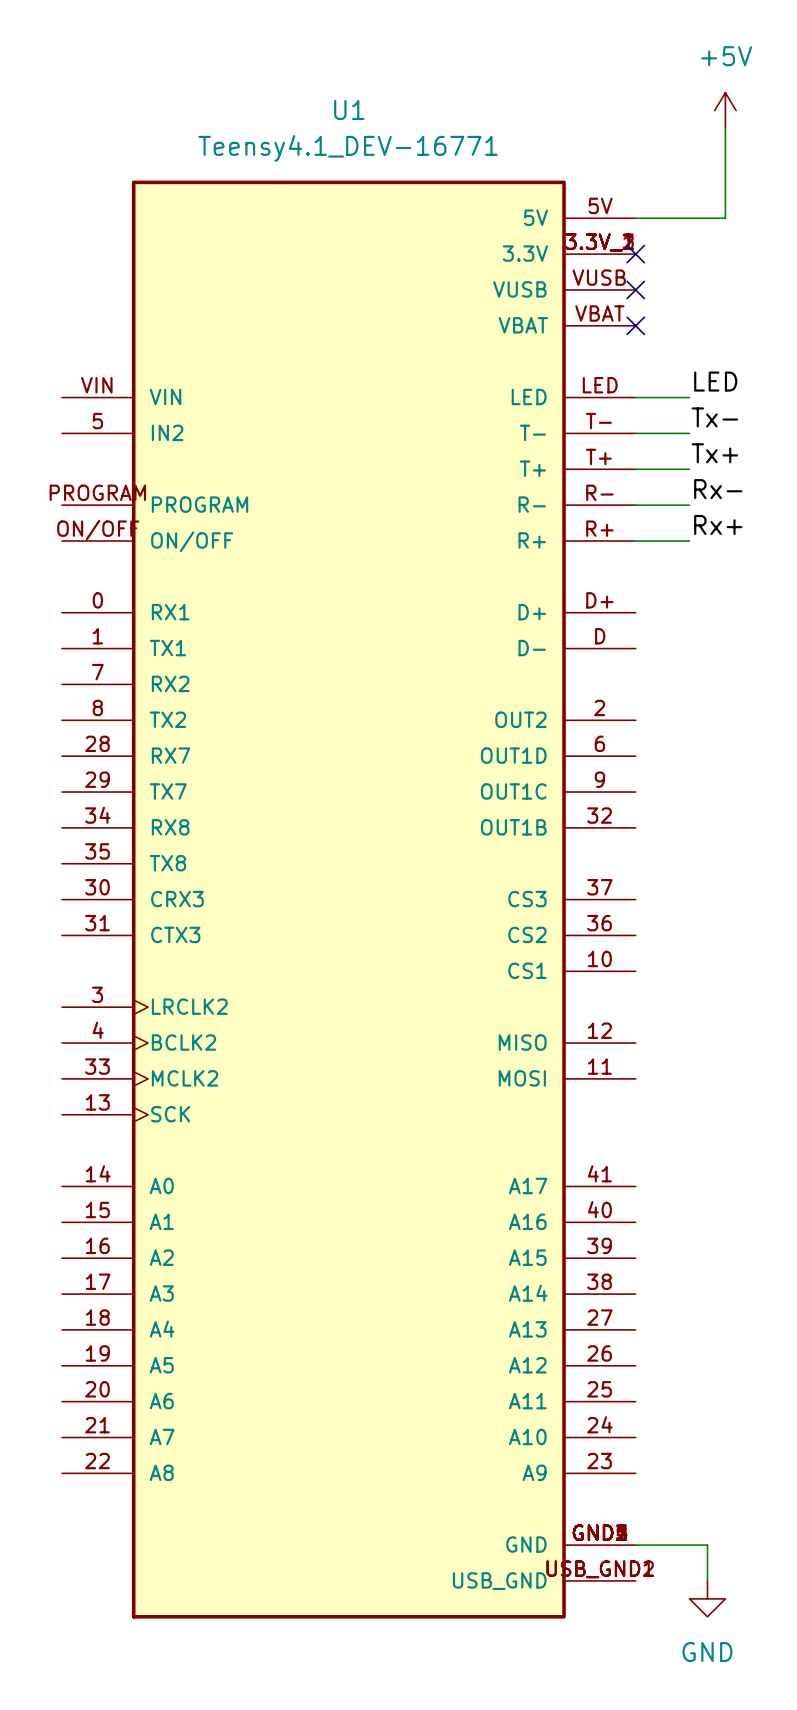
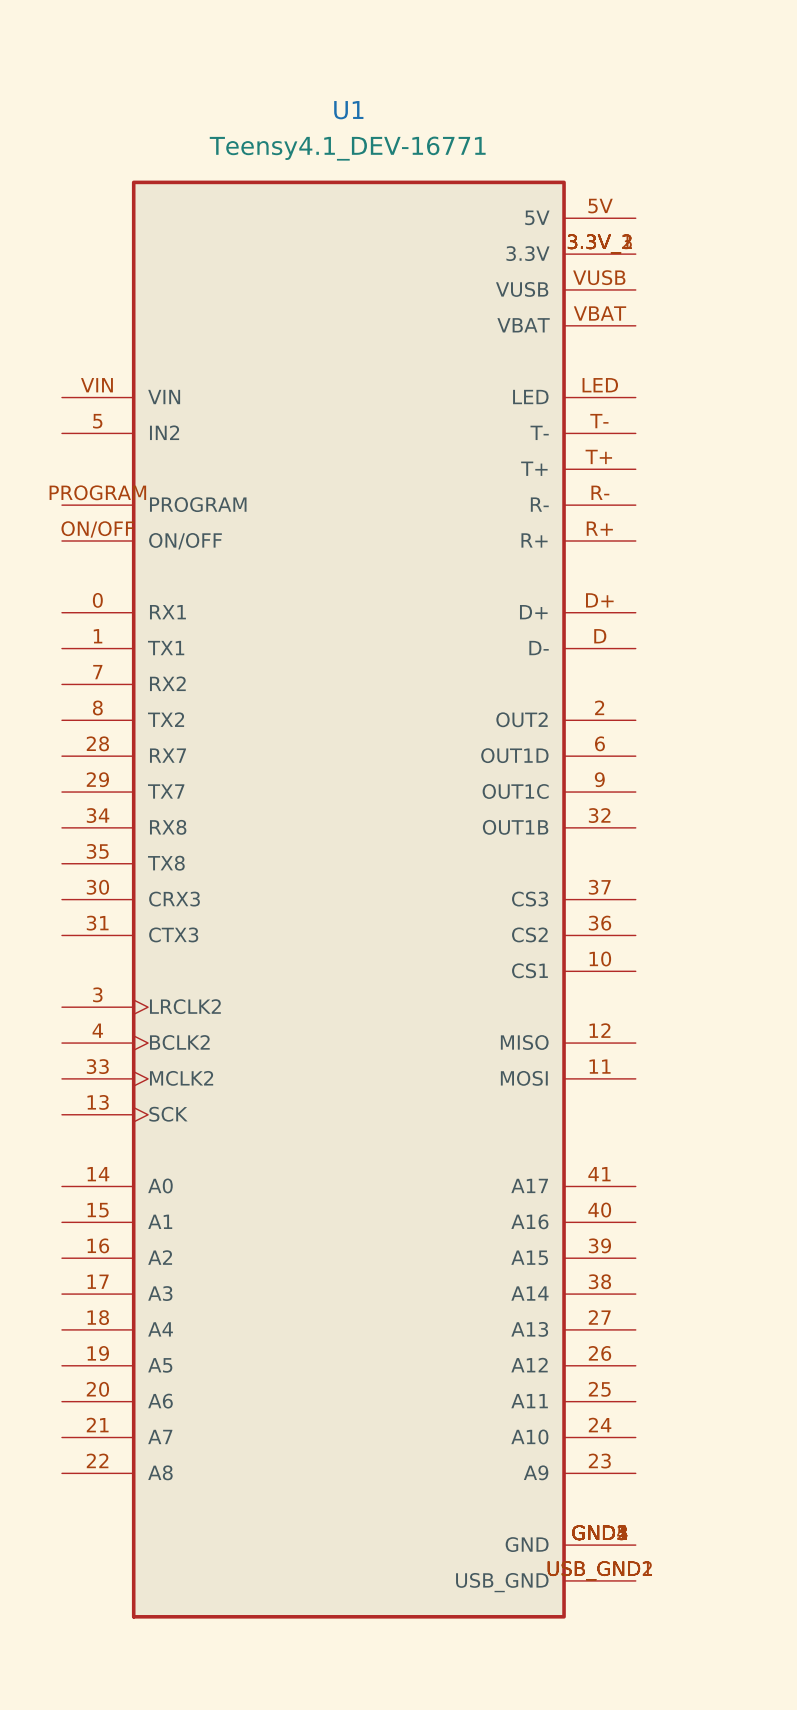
power symbol: +5V (725, 110) -> none
wire: (725, 128) (725, 218) (635, 218) -> none
no-connect mark: (635, 254) -> none
no-connect mark: (635, 289) -> none
no-connect mark: (635, 325) -> none
label: LED (715, 381) -> none
wire: (635, 397) (689, 397) -> none
label: Tx- (714, 417) -> none
wire: (635, 433) (689, 433) -> none
label: Tx+ (714, 453) -> none
wire: (635, 469) (689, 469) -> none
label: Rx- (718, 489) -> none
wire: (635, 505) (689, 505) -> none
label: Rx+ (718, 524) -> none
wire: (635, 540) (689, 540) -> none
wire: (635, 1545) (707, 1545) (707, 1580) -> none
power symbol: GND (707, 1598) -> none

